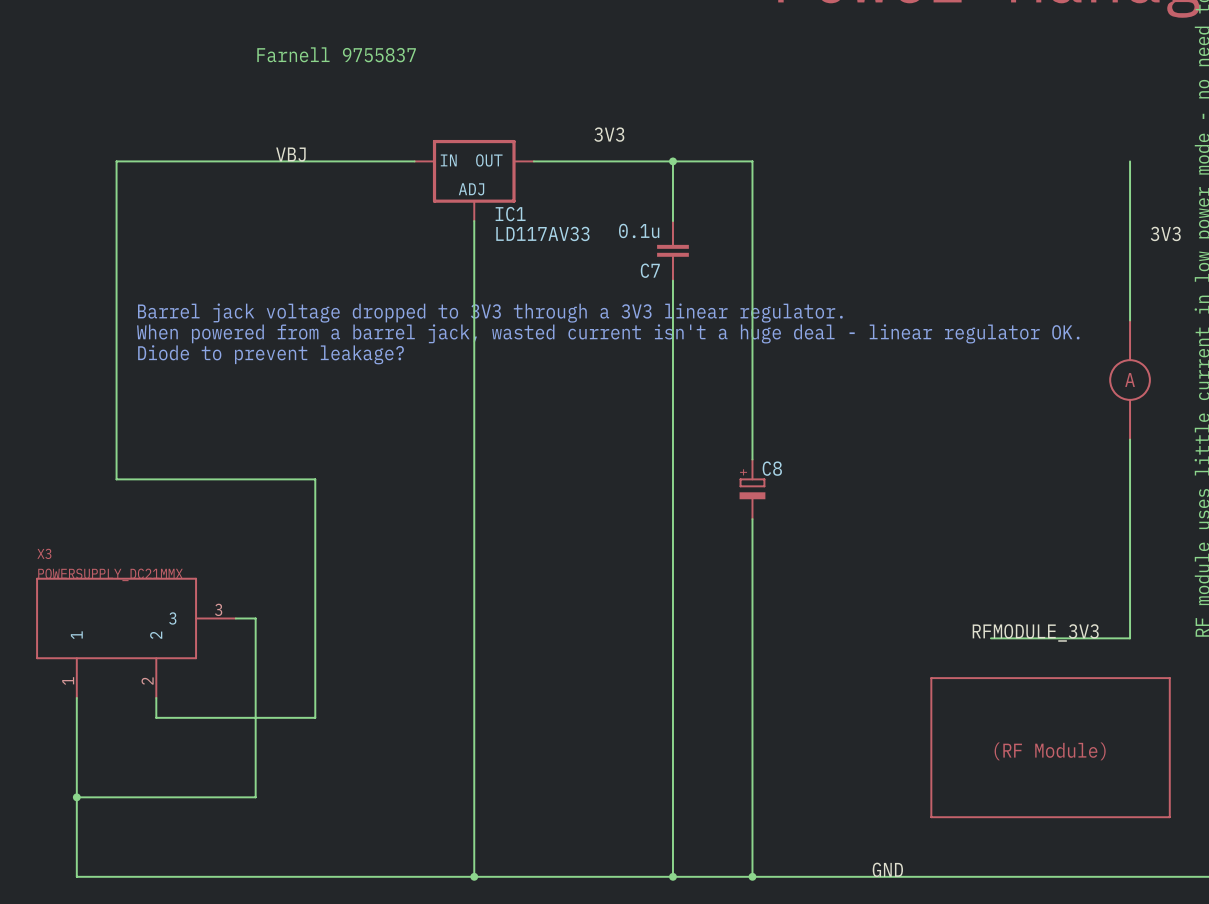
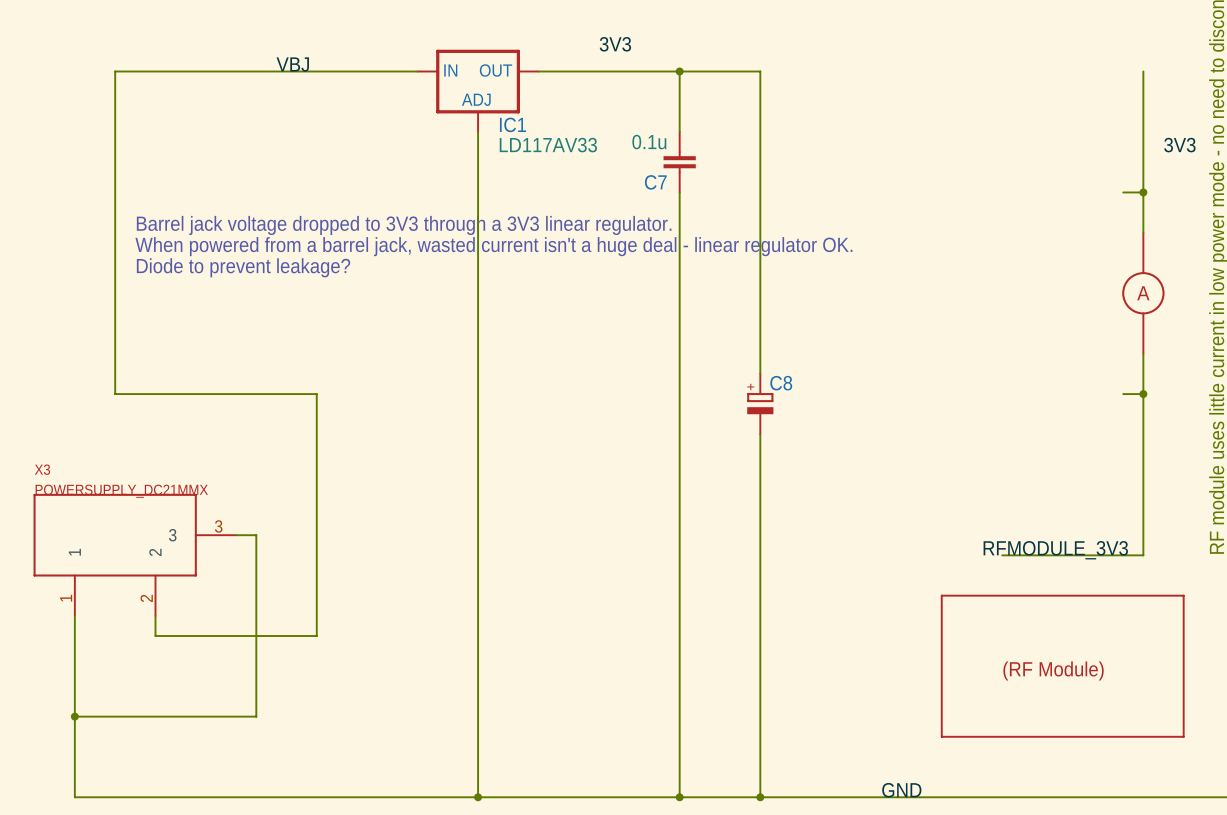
wire: none -> (1123, 192) (1143, 192)
junction: none -> (1143, 192)
wire: none -> (1123, 394) (1143, 394)
junction: none -> (1143, 394)

